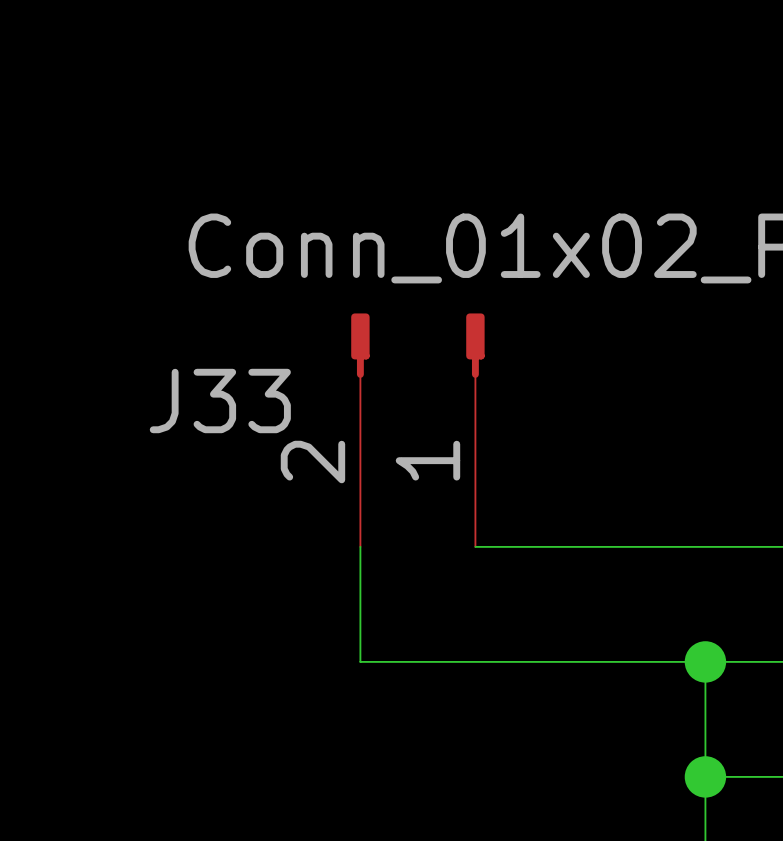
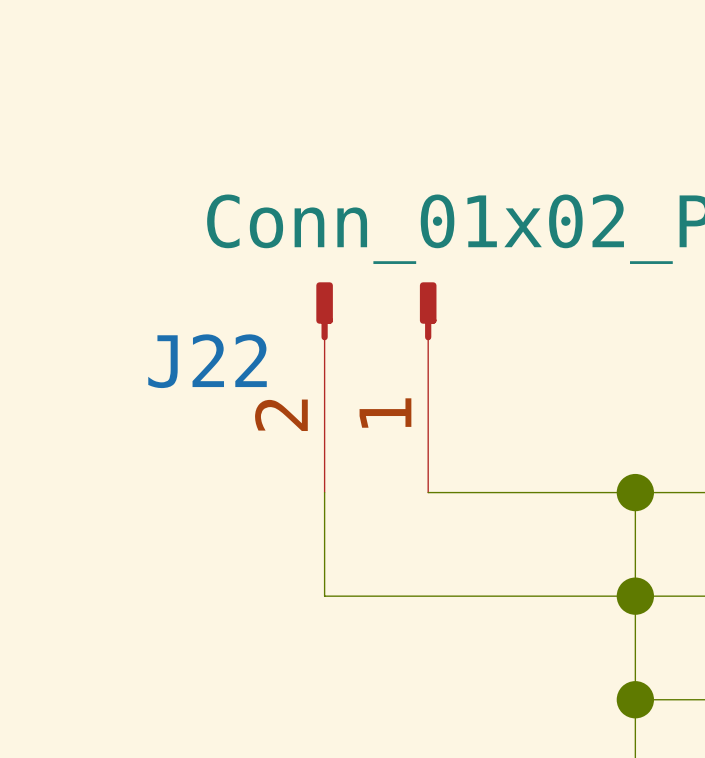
J33 name: J33 (220, 401) -> J22 (207, 361)
wire: none -> (635, 492) (635, 596)
junction: none -> (635, 492)

